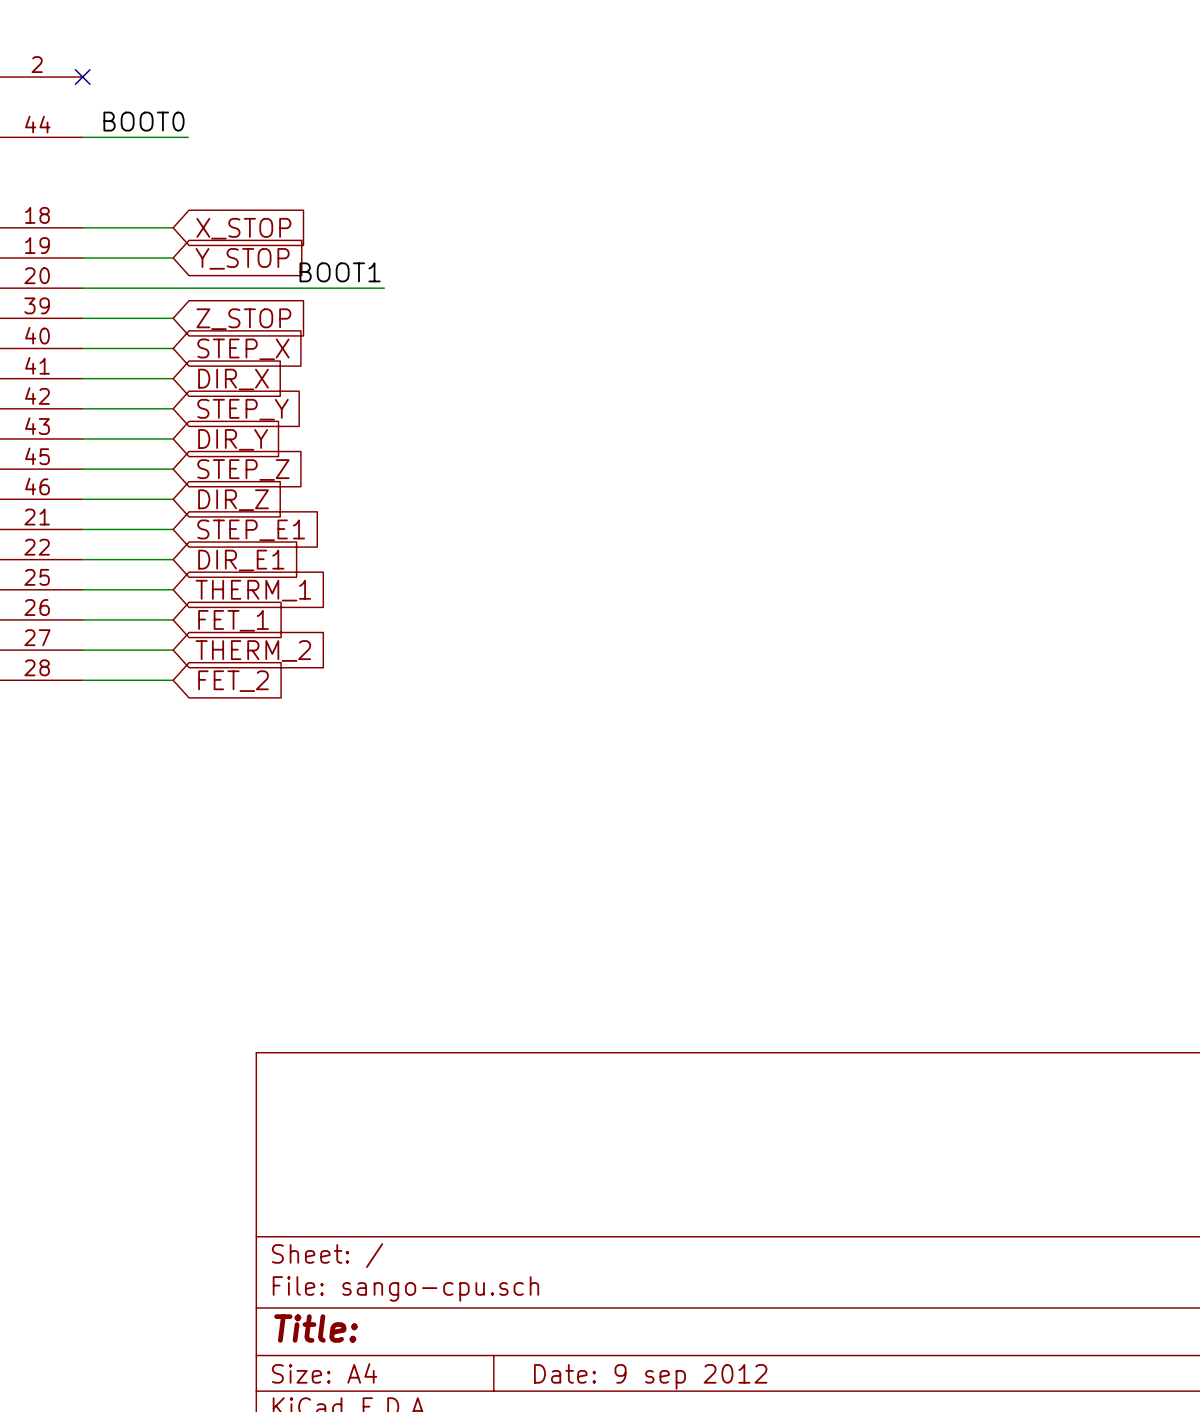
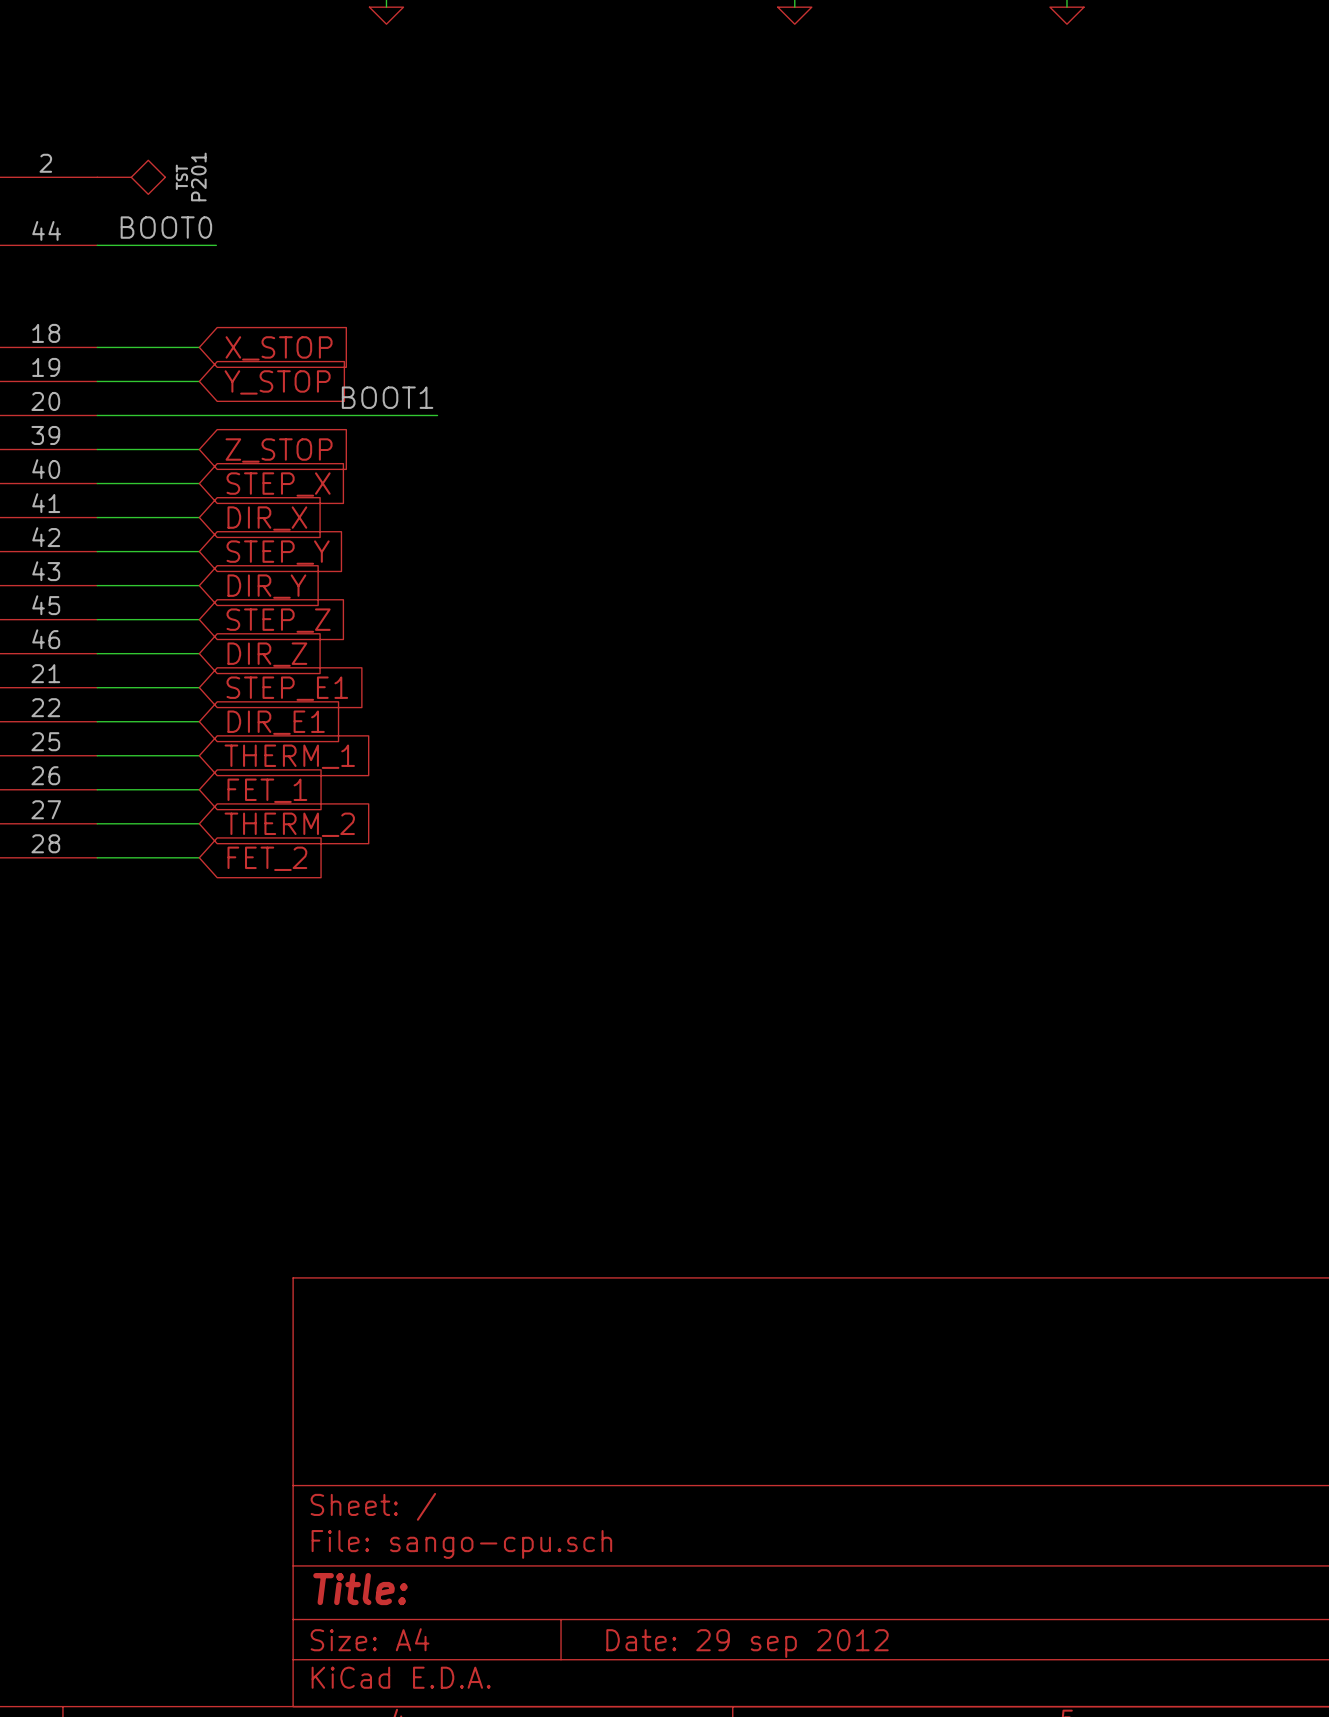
no-connect mark: (82, 77) -> none
P201: none -> TST (131, 177)
title block: Date: 9 sep 2012 (650, 1376) -> Date: 29 sep 2012 (747, 1643)

